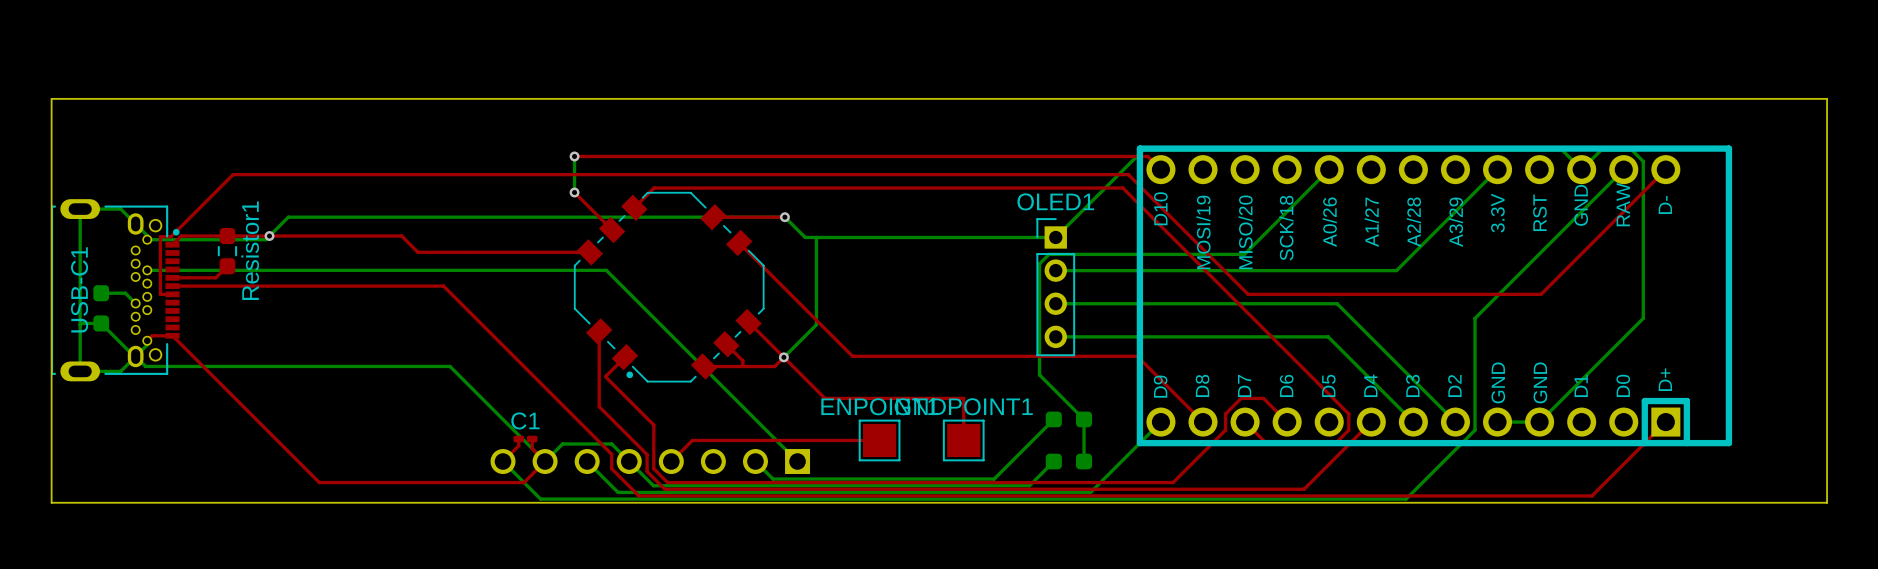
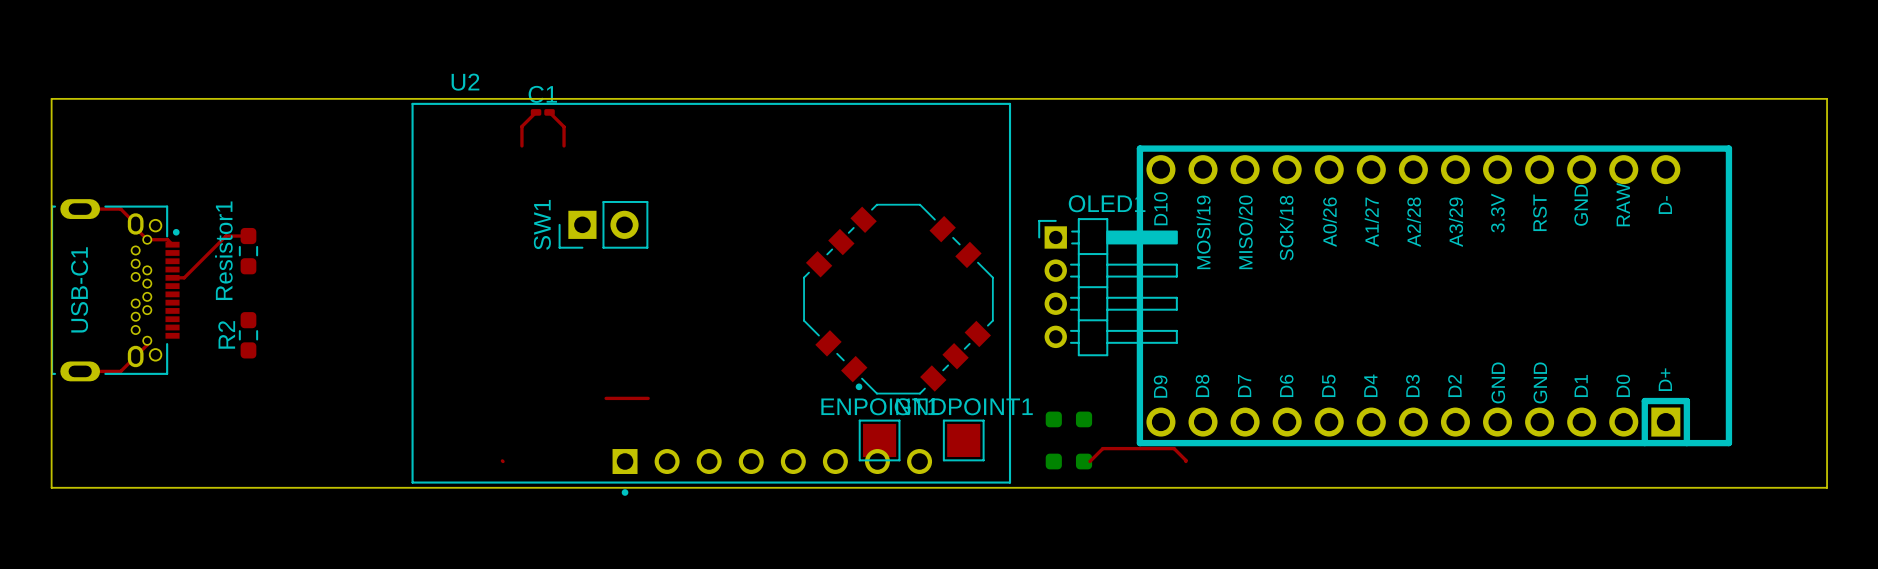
top track: none -> (536, 112) (521, 126) (521, 145)
top track: none -> (549, 112) (564, 126) (564, 145)
top track: (574, 156) (1147, 156) (1160, 169) -> none
bottom track: (574, 156) (574, 192) -> none
via: (574, 156) -> none
bottom track: (1329, 169) (1244, 254) (1049, 254) (1039, 263) (1039, 374) (1084, 419) (1084, 461) -> none
bottom track: (1497, 169) (1396, 270) (1055, 270) -> none
bottom track: (1623, 169) (1475, 318) (1475, 430) (1406, 499) (540, 499) (503, 461) -> none
top track: (1665, 169) (1541, 294) (1248, 294) (1128, 174) (233, 174) (171, 236) (160, 236) (160, 294) (172, 294) -> none
top track: (574, 192) (612, 230) -> none
via: (574, 192) -> none
top track: (634, 207) (654, 188) (1122, 188) (1348, 413) (1348, 430) (1337, 441) (1264, 441) (1245, 422) -> none
top track: (713, 217) (784, 217) -> none
via: (784, 217) -> none
OLED1 footprint: [1036, 218, 1076, 357] -> [1038, 218, 1178, 357]
SW1: none -> (603, 224)
top track: (226, 236) (181, 236) (172, 244) -> (80, 209) (120, 209) (135, 223) (135, 228) (147, 239) (167, 239) (172, 244)
top track: (248, 236) (401, 236) (417, 252) (589, 252) -> none
via: (269, 236) -> none
bottom track: (816, 237) (816, 324) (783, 357) -> none
top track: (739, 242) (852, 356) (1137, 356) (1203, 422) -> none
Resistor1 name position: Resistor1 (250, 250) -> Resistor1 (223, 250)
Resistor1 position: (227, 251) -> (248, 251)
top track: (227, 266) (215, 277) (184, 277) -> (226, 236) (184, 277)
bottom track: (147, 270) (606, 270) (797, 461) -> none
top track: (172, 286) (443, 286) (611, 454) (611, 468) (638, 495) (1591, 495) (1665, 422) -> none
part position: (669, 287) -> (898, 299)
bottom track: (101, 293) (125, 293) (135, 303) -> none
bottom track: (1055, 303) (1337, 303) (1455, 422) -> none
R2 side: bottom (101, 308) -> top (248, 335)
top track: (748, 322) (824, 398) (963, 398) (963, 440) -> none
bottom track: (80, 324) (101, 323) (145, 366) (450, 366) (545, 461) (562, 443) (611, 443) (653, 485) (1029, 485) (1053, 461) -> none
top track: (599, 331) (599, 406) (647, 454) (647, 471) (664, 489) (1304, 489) (1371, 422) -> none
bottom track: (1055, 336) (1328, 336) (1413, 422) -> none
top track: (147, 340) (152, 335) (172, 335) (319, 482) (524, 482) (545, 461) (532, 448) (532, 438) -> (147, 340) (147, 344) (120, 371) (80, 371)
bottom track: (147, 340) (147, 344) (120, 371) (80, 371) (80, 209) (120, 209) (147, 235) (147, 239) (265, 239) (288, 217) (784, 217) (805, 237) (1055, 237) (1143, 150) (1562, 150) (1581, 169) (1601, 150) (1631, 150) (1643, 161) (1643, 318) (1539, 422) (1497, 422) -> none
top track: (726, 344) (742, 360) (742, 366) -> none
top track: (625, 357) (606, 377) (653, 425) (653, 468) (667, 482) (1173, 482) (1225, 430) (1225, 413) (1241, 398) (1263, 398) (1287, 422) -> none
top track: (783, 357) (774, 366) (704, 366) -> none
via: (783, 357) -> none
top track: none -> (606, 398) (648, 398)
bottom track: (1053, 419) (994, 479) (772, 479) (755, 461) -> none
bottom track: (1160, 422) (1090, 492) (618, 492) (587, 461) -> none
top track: (518, 438) (518, 445) (503, 461) -> (502, 460) (503, 461)
C1 position: (525, 438) -> (542, 112)
top track: (879, 440) (692, 440) (671, 461) -> none
U2 side: bottom (650, 461) -> top (711, 299)
top track: none -> (1089, 461) (1102, 448) (1174, 448) (1185, 461)
board edge: (51, 487) (51, 502) (1827, 502) (1827, 487) -> (51, 487) (1827, 487)

